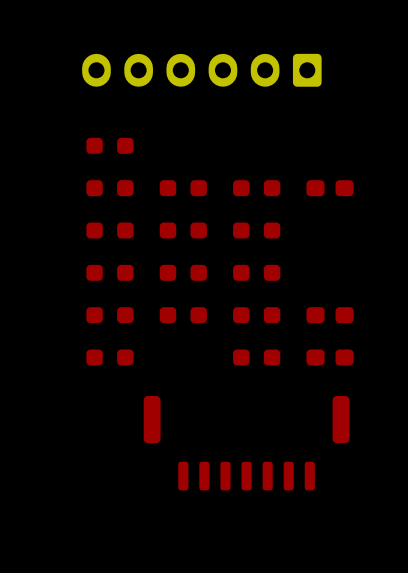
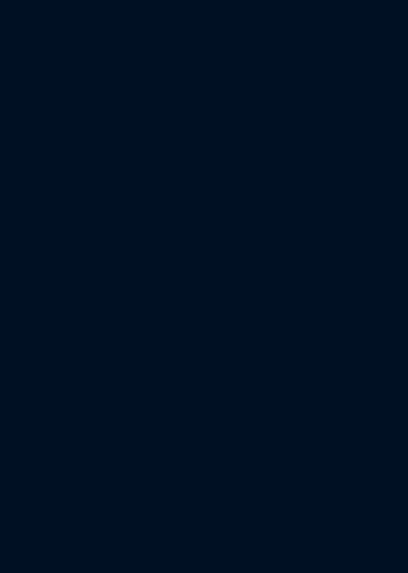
part: (201, 70) -> none
part: (109, 145) -> none
part: (109, 188) -> none
part: (183, 188) -> none
part: (256, 188) -> none
part: (330, 188) -> none
part: (109, 230) -> none
part: (183, 230) -> none
part: (256, 230) -> none
part: (109, 272) -> none
part: (183, 272) -> none
part: (256, 272) -> none
part: (109, 315) -> none
part: (183, 315) -> none
part: (256, 315) -> none
part: (330, 315) -> none
part: (109, 357) -> none
part: (256, 357) -> none
part: (330, 357) -> none
part: (246, 443) -> none

